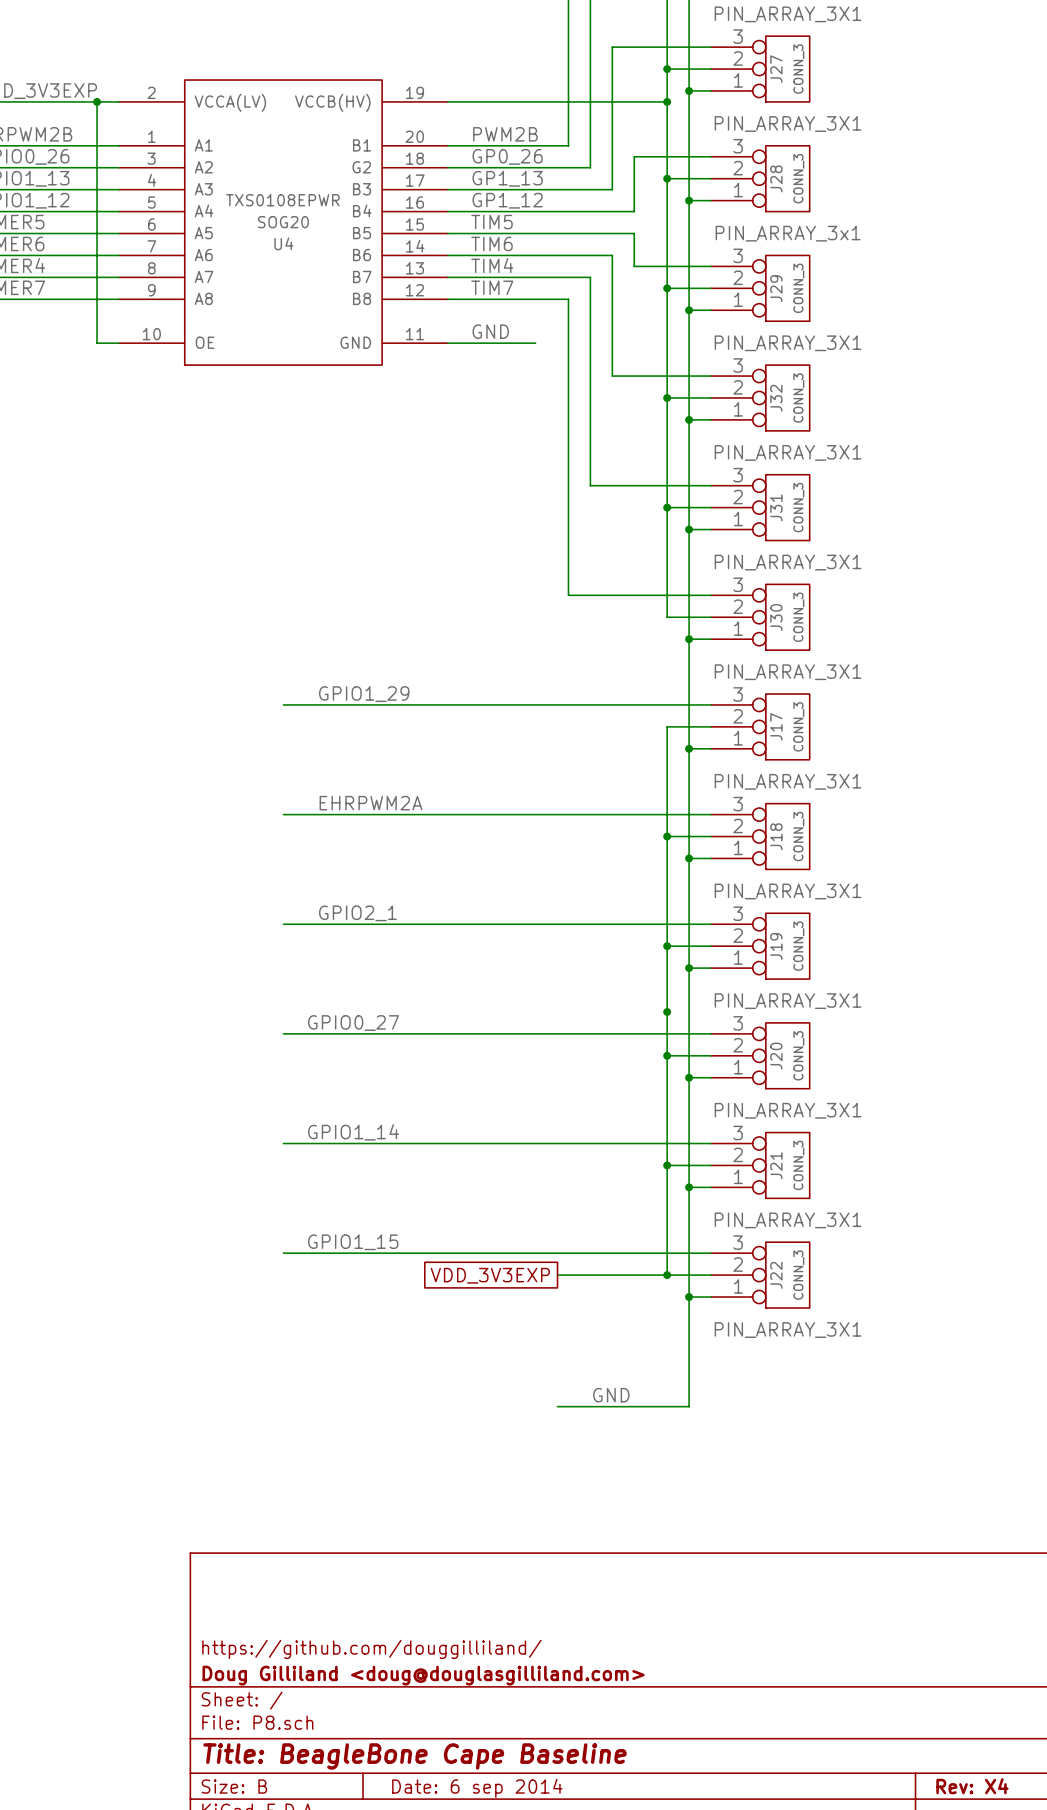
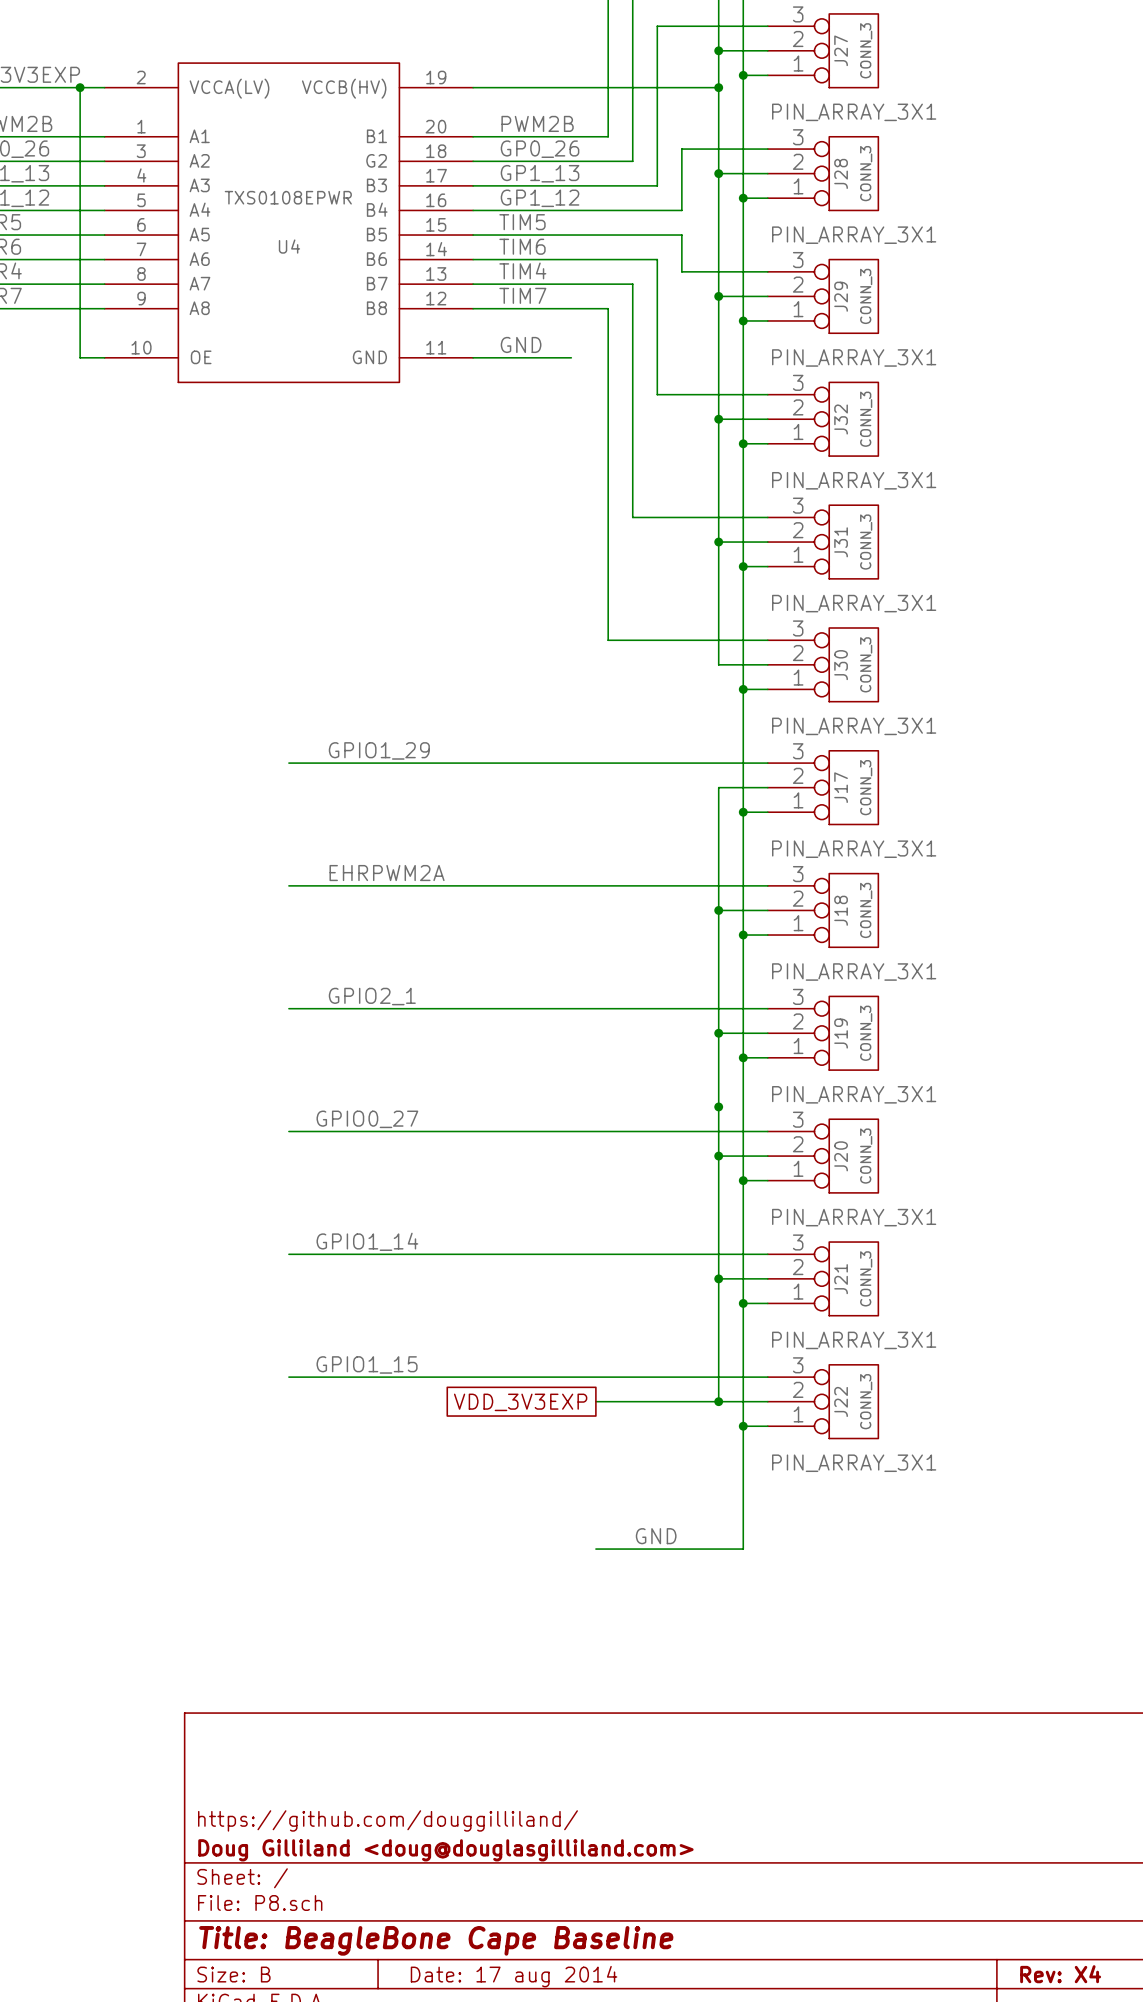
U4 text: SOG20 (283, 222) -> none
J28 text: PIN_ARRAY_3x1 (788, 233) -> PIN_ARRAY_3X1 (854, 235)
title block: Date: 6 sep 2014 (477, 1788) -> Date: 17 aug 2014 (514, 1976)

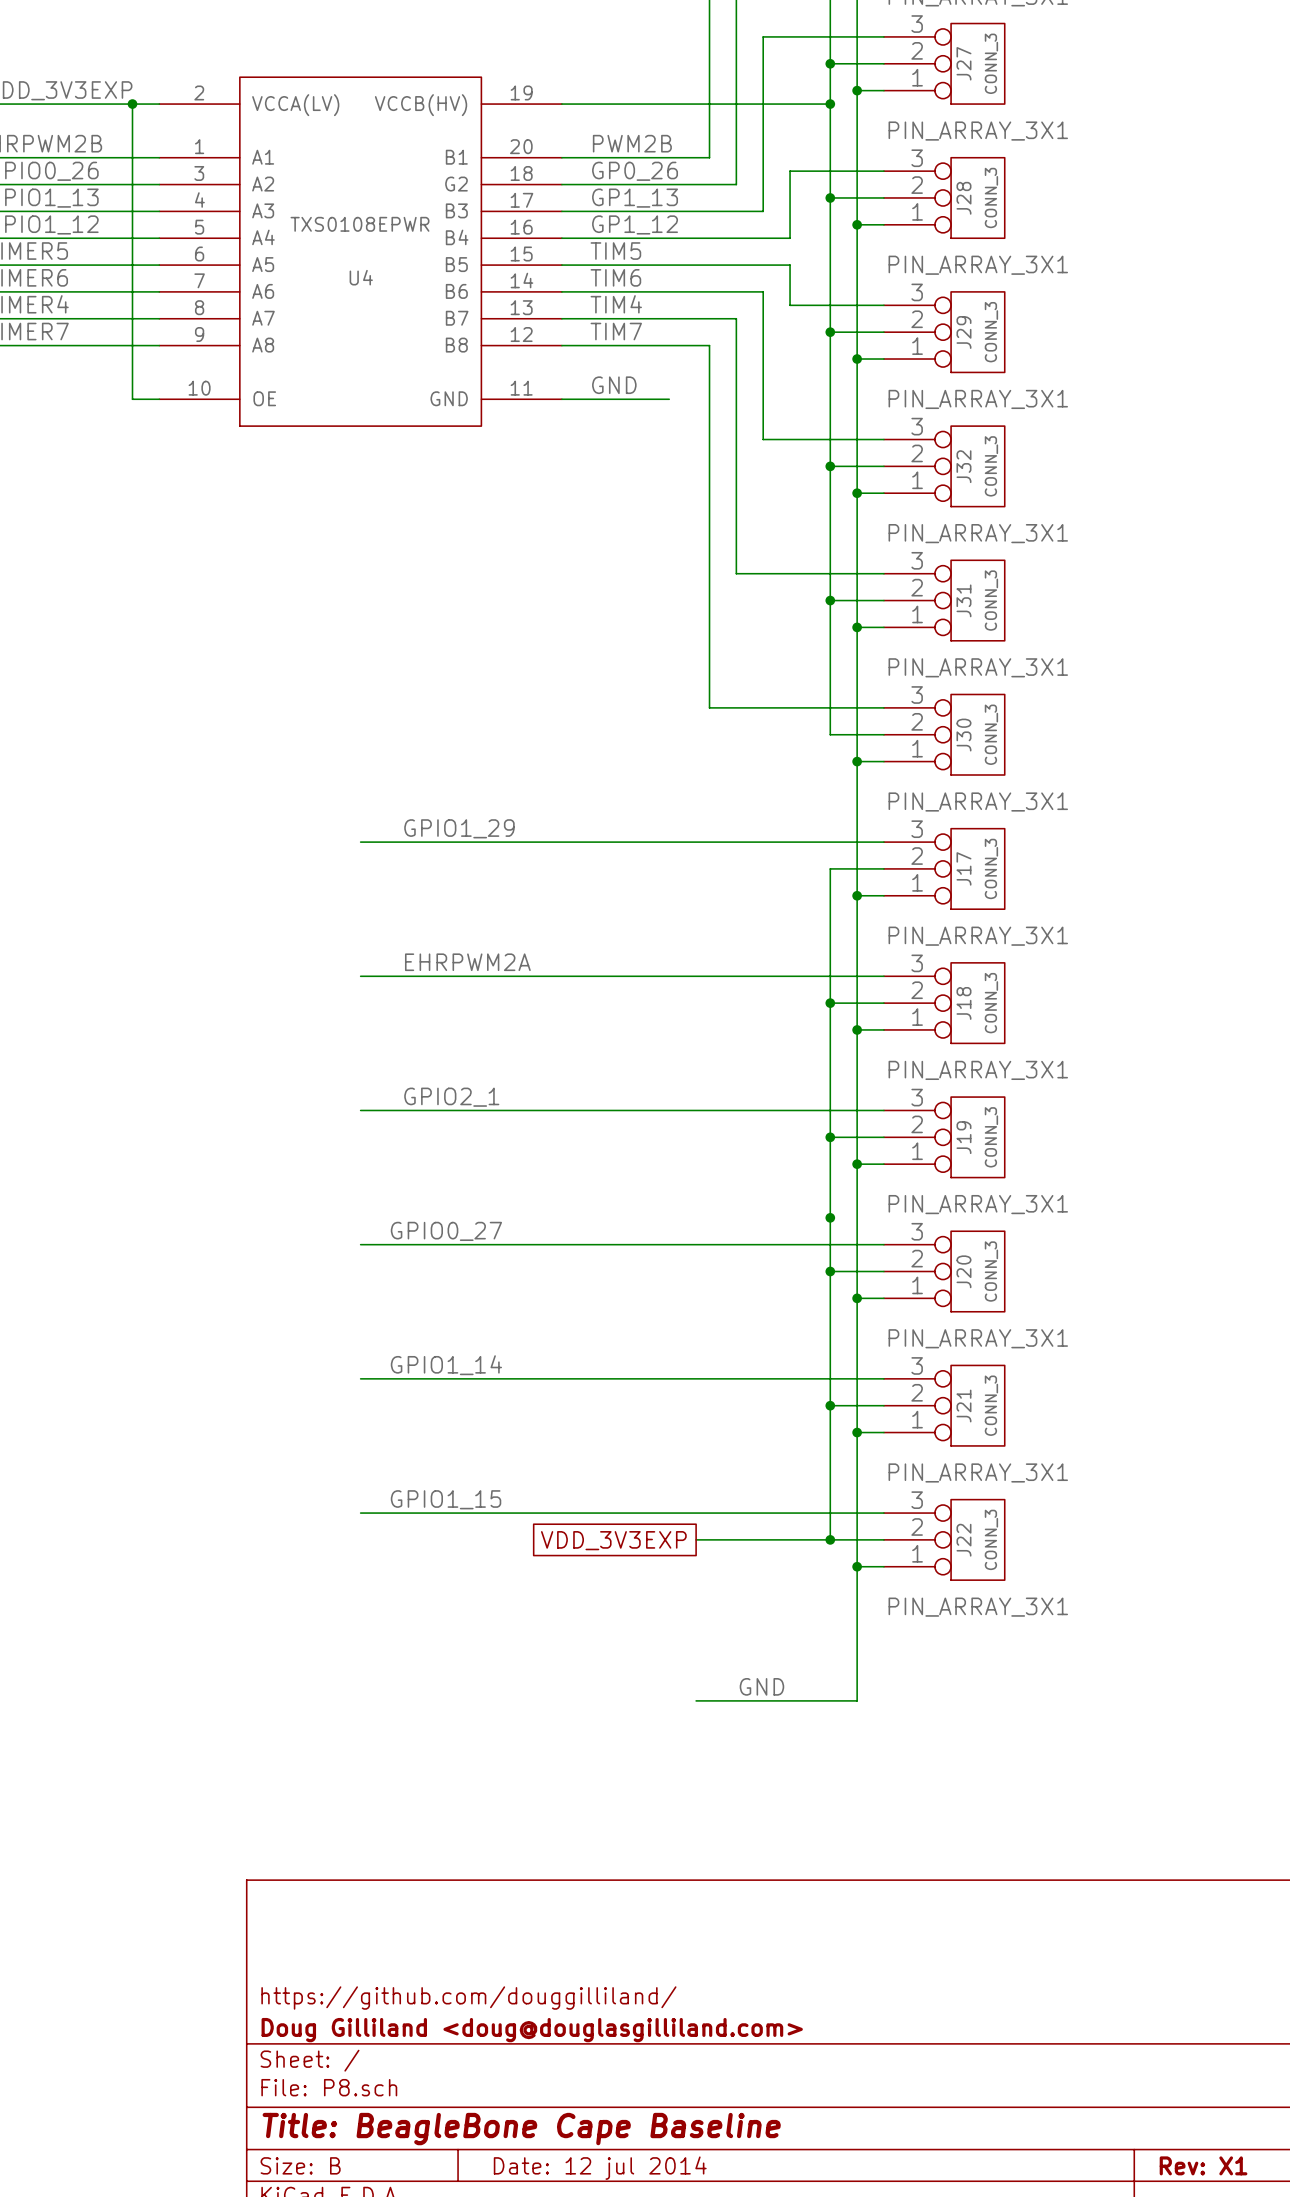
title block: Rev: X4 (1060, 1974) -> Rev: X1 (1203, 2165)
title block: Date: 17 aug 2014 (514, 1976) -> Date: 12 jul 2014 (600, 2168)

